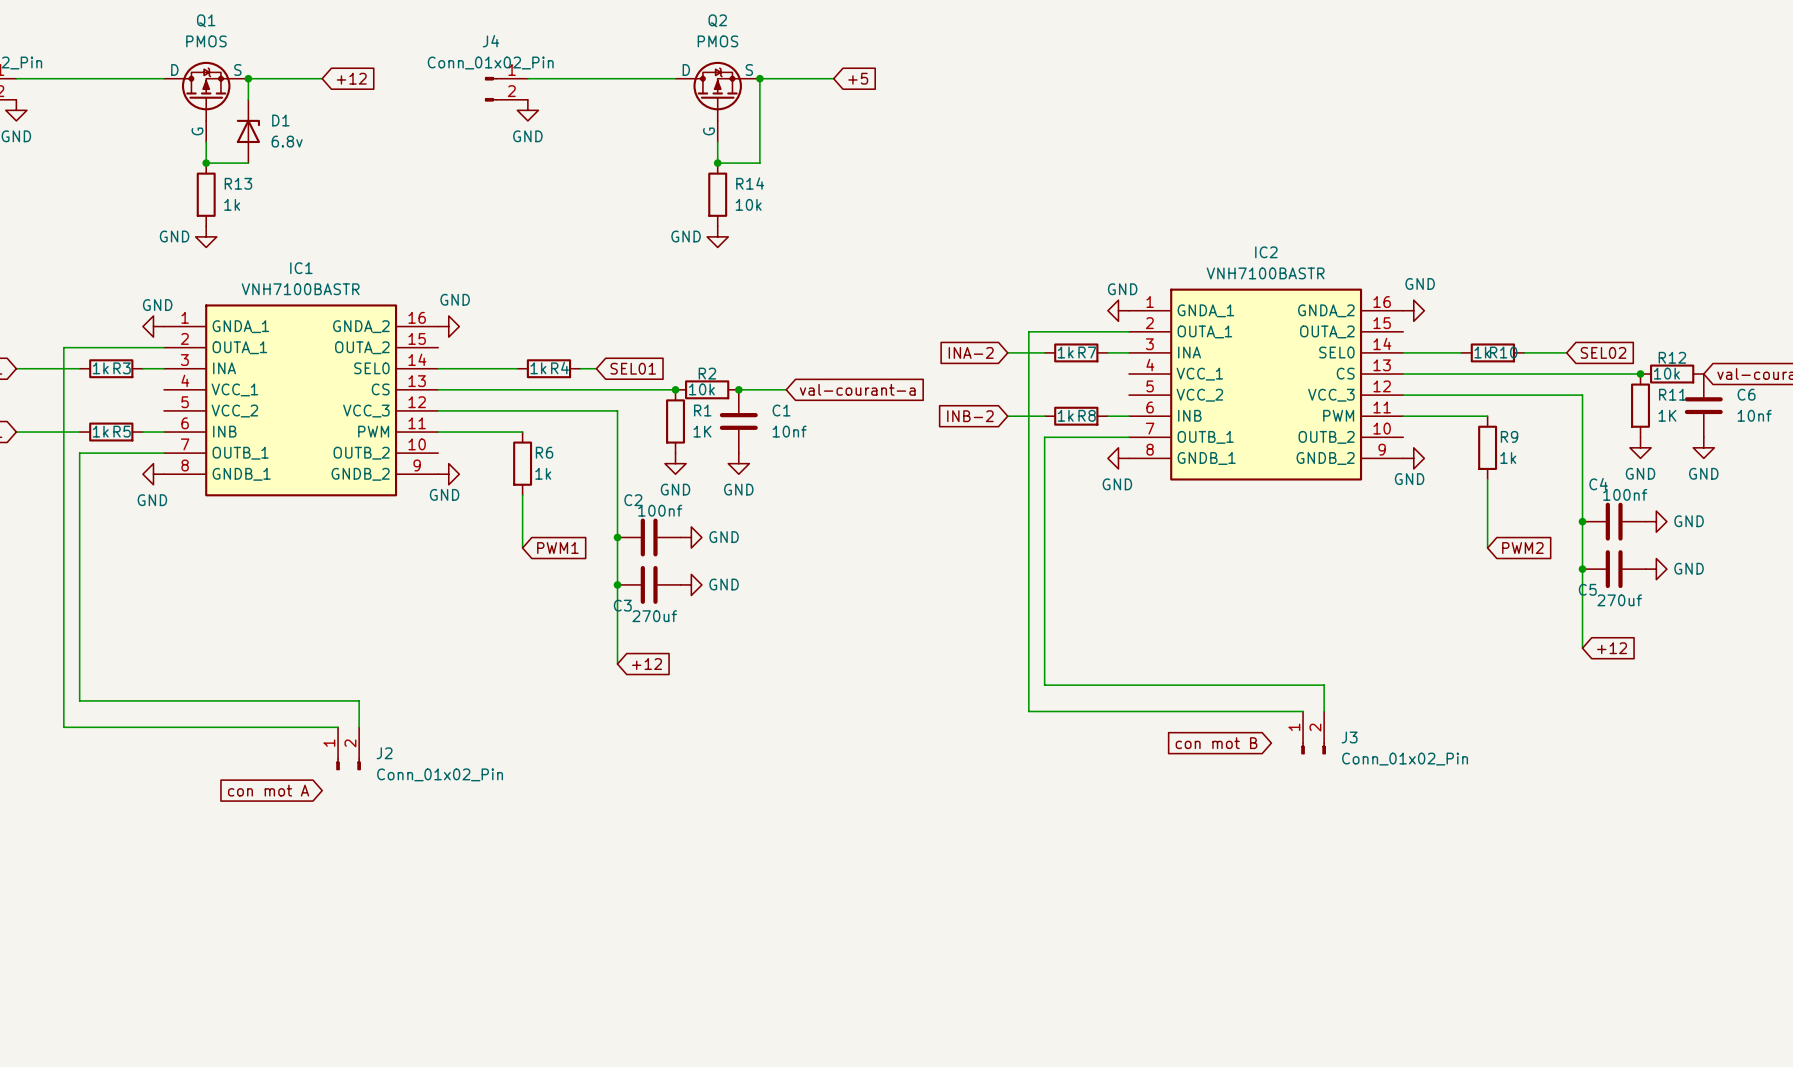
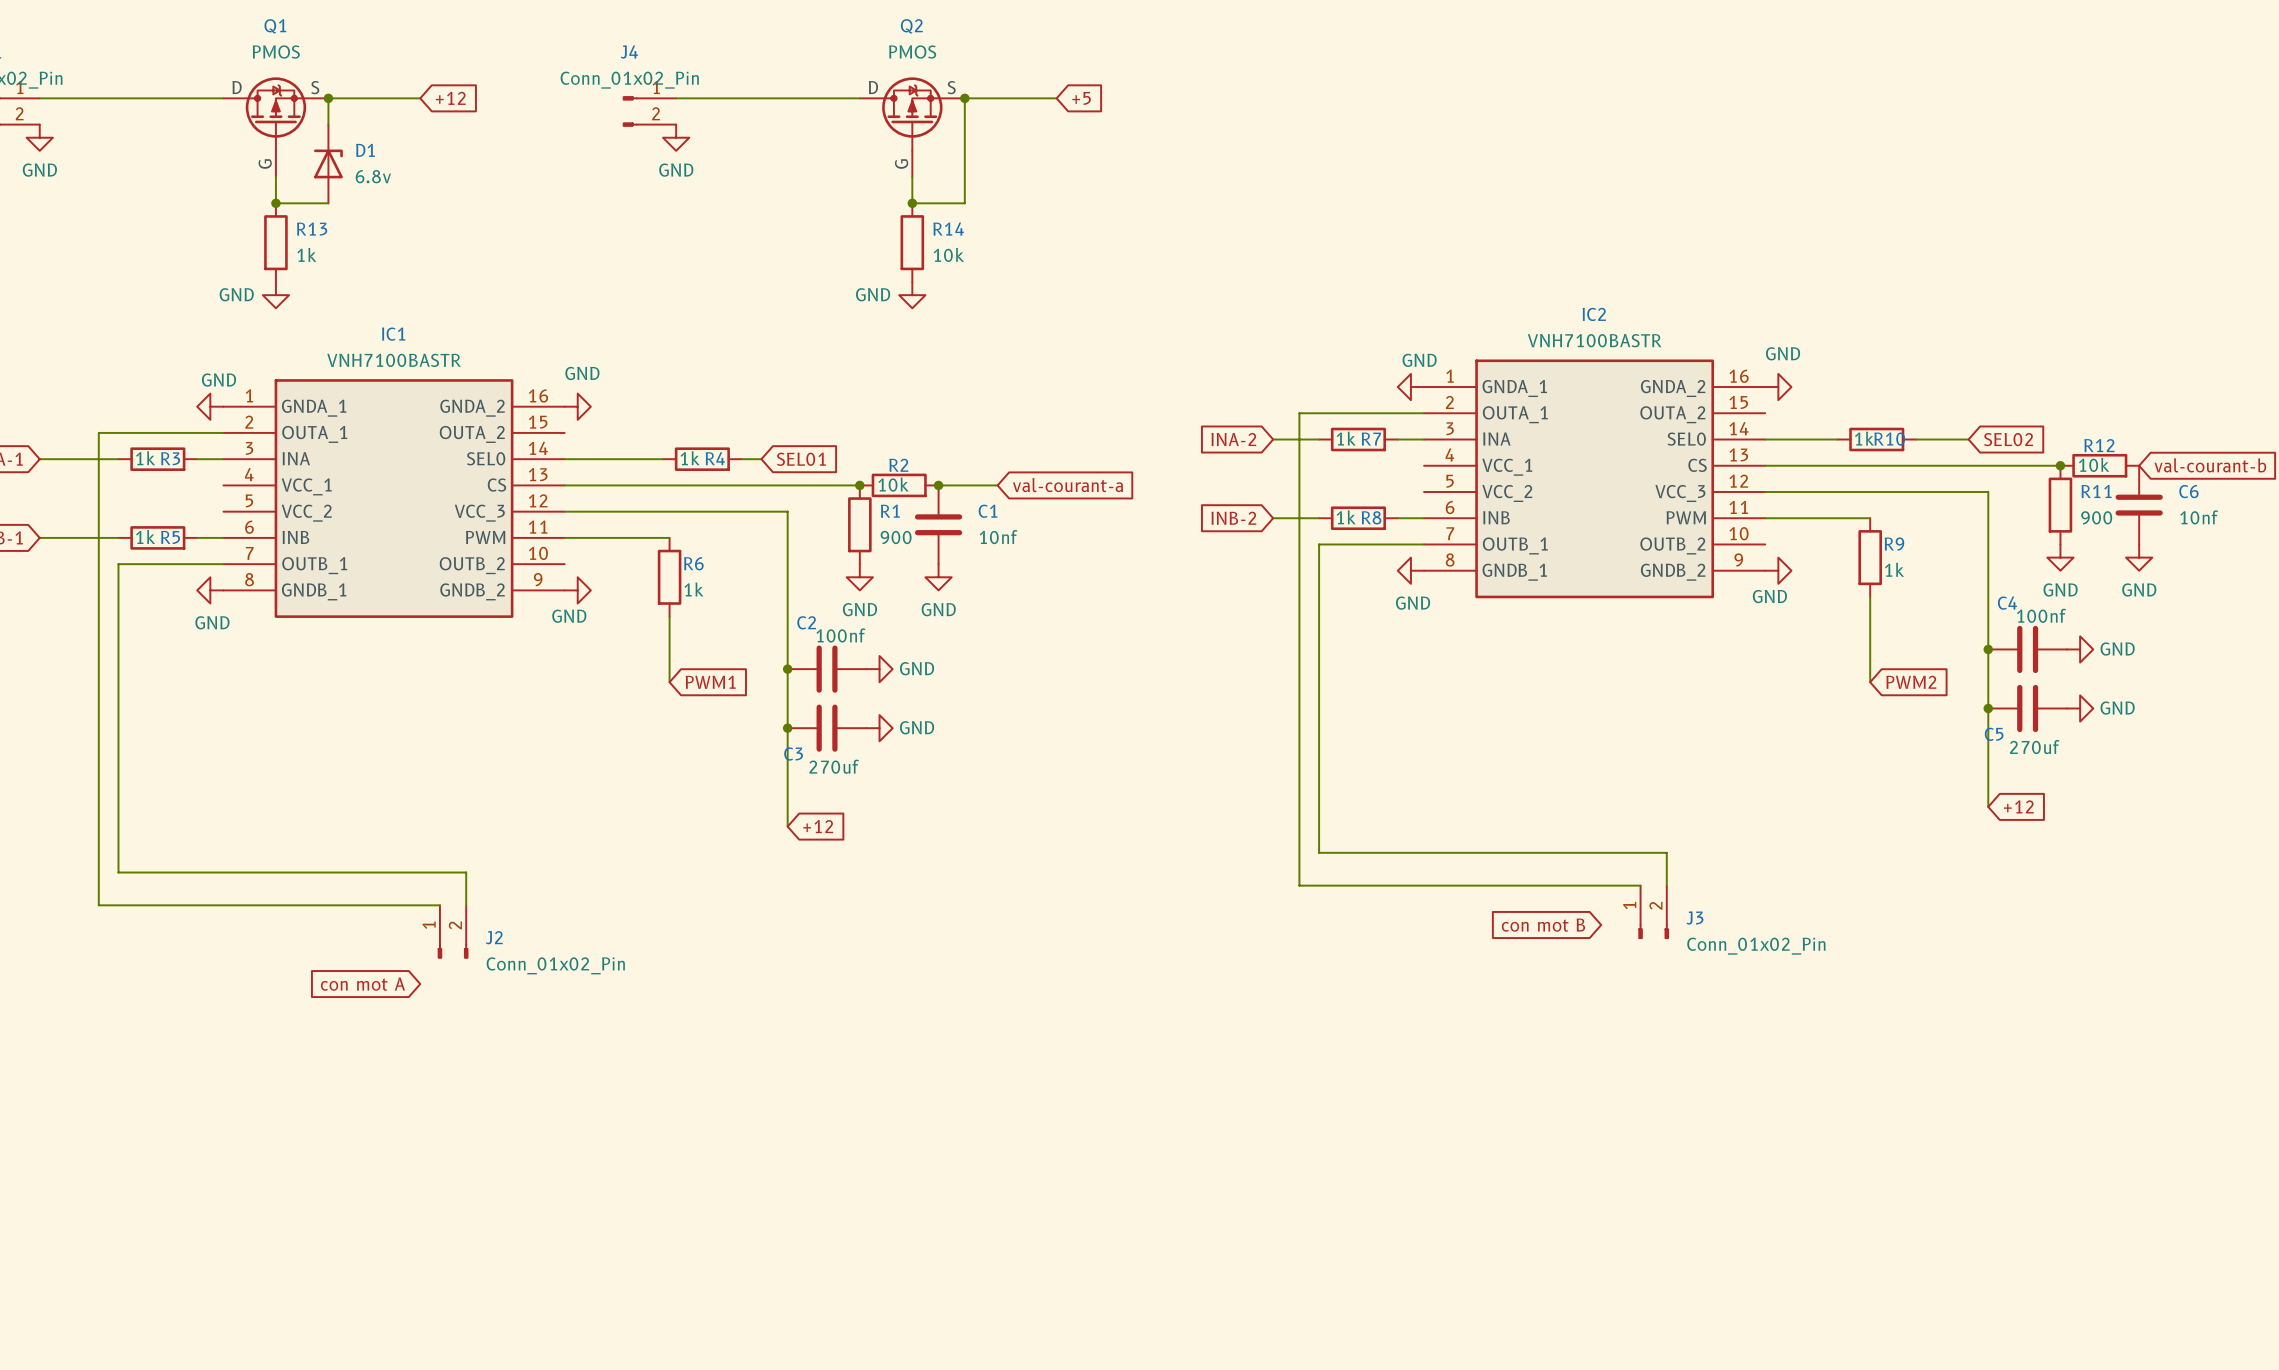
R11 value: 1K (1667, 415) -> 900 (2096, 517)
R1 value: 1K (702, 431) -> 900 (896, 537)

